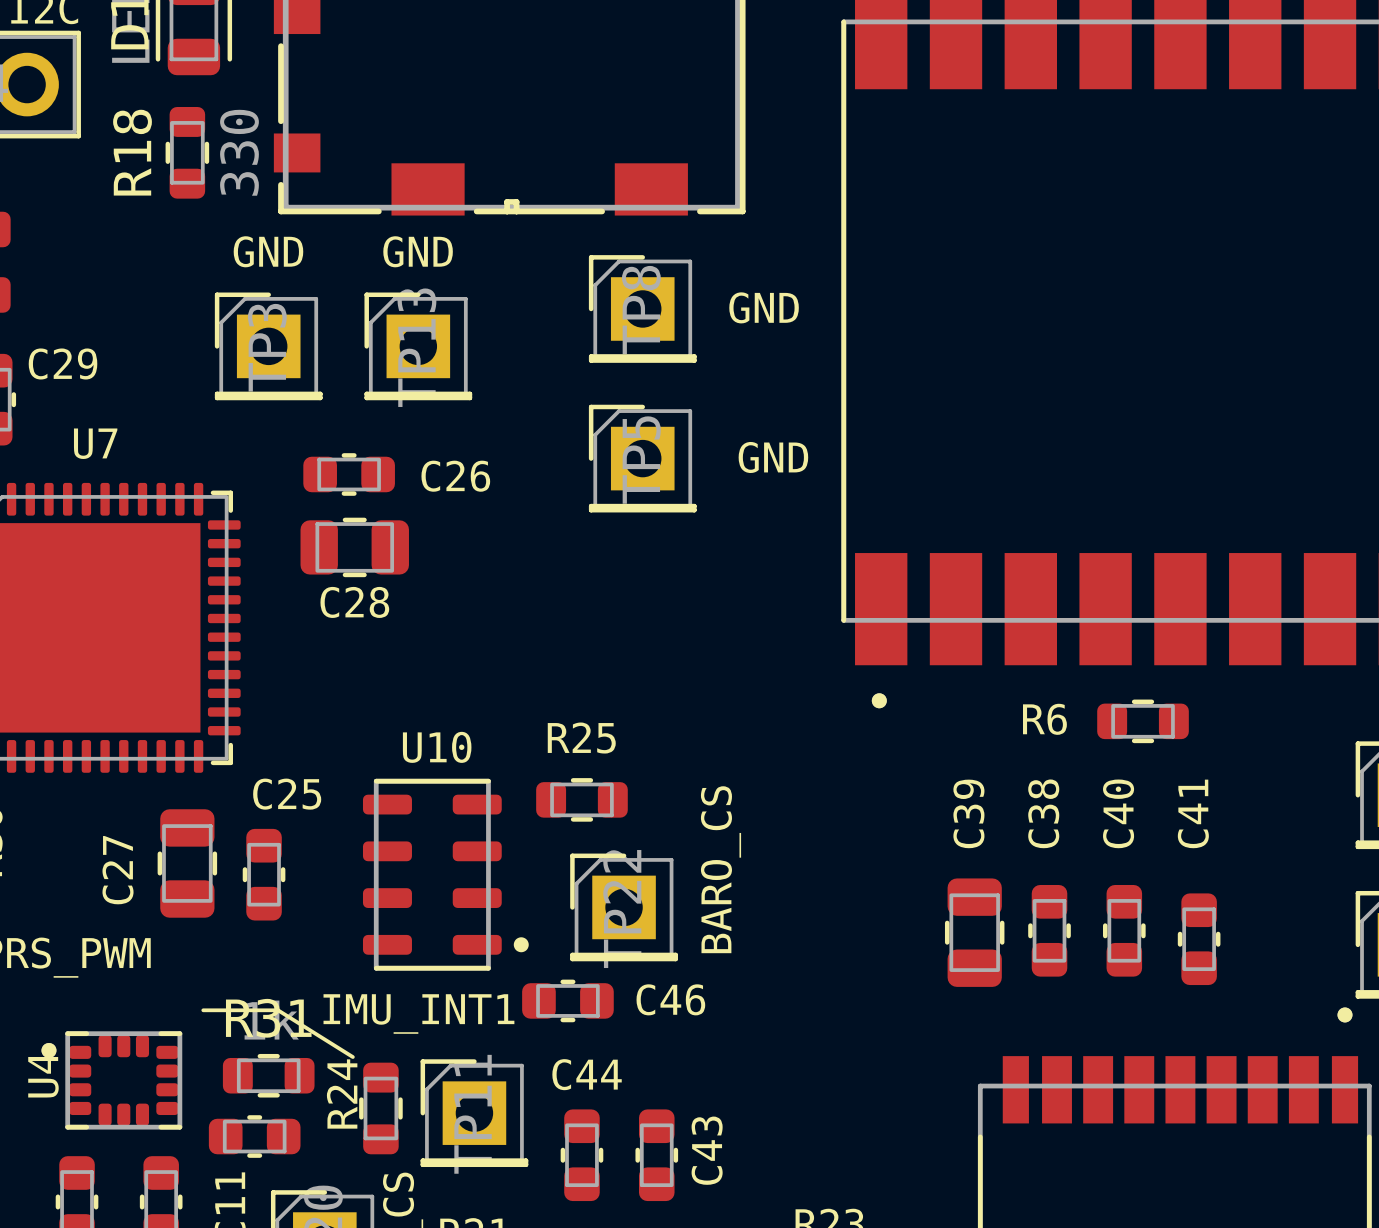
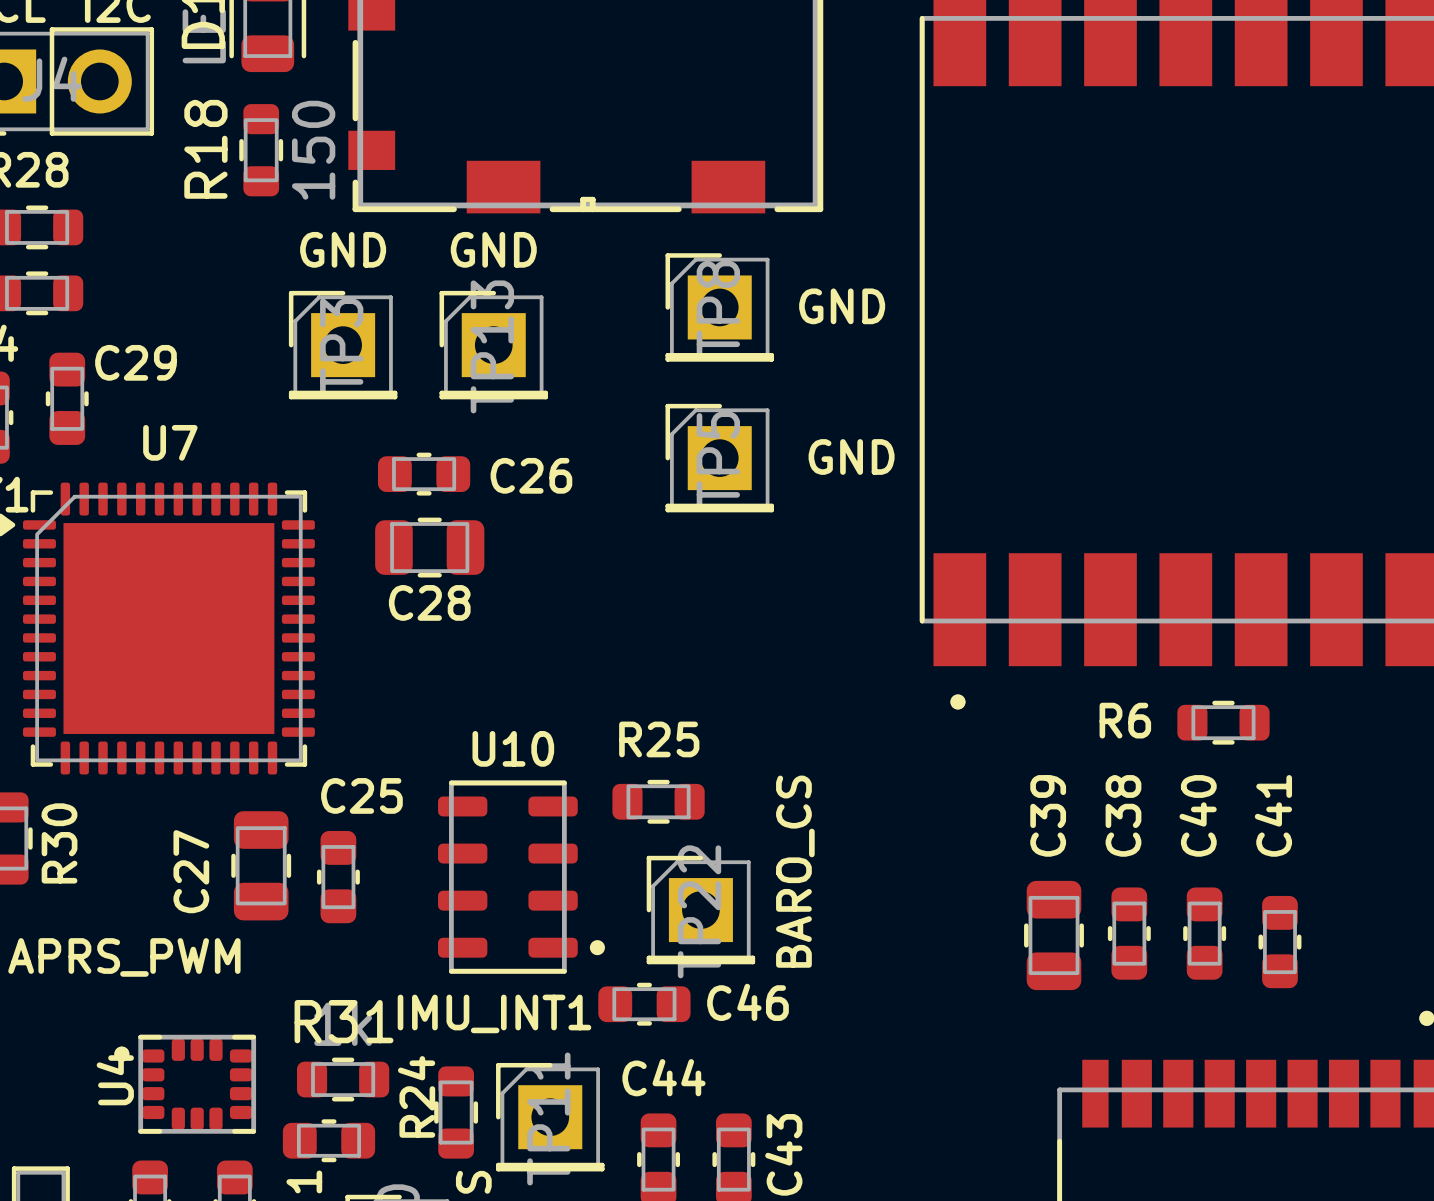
R18 value: 330 (239, 152) -> 150 (313, 150)
line: (203, 1010) (278, 1010) (352, 1057) -> none

